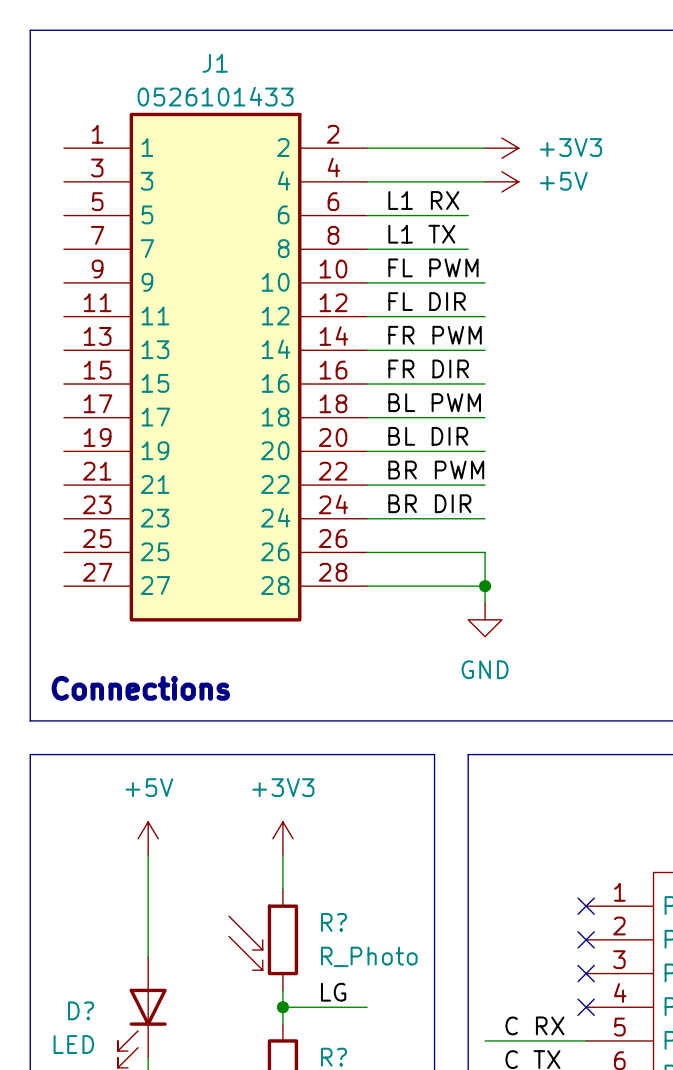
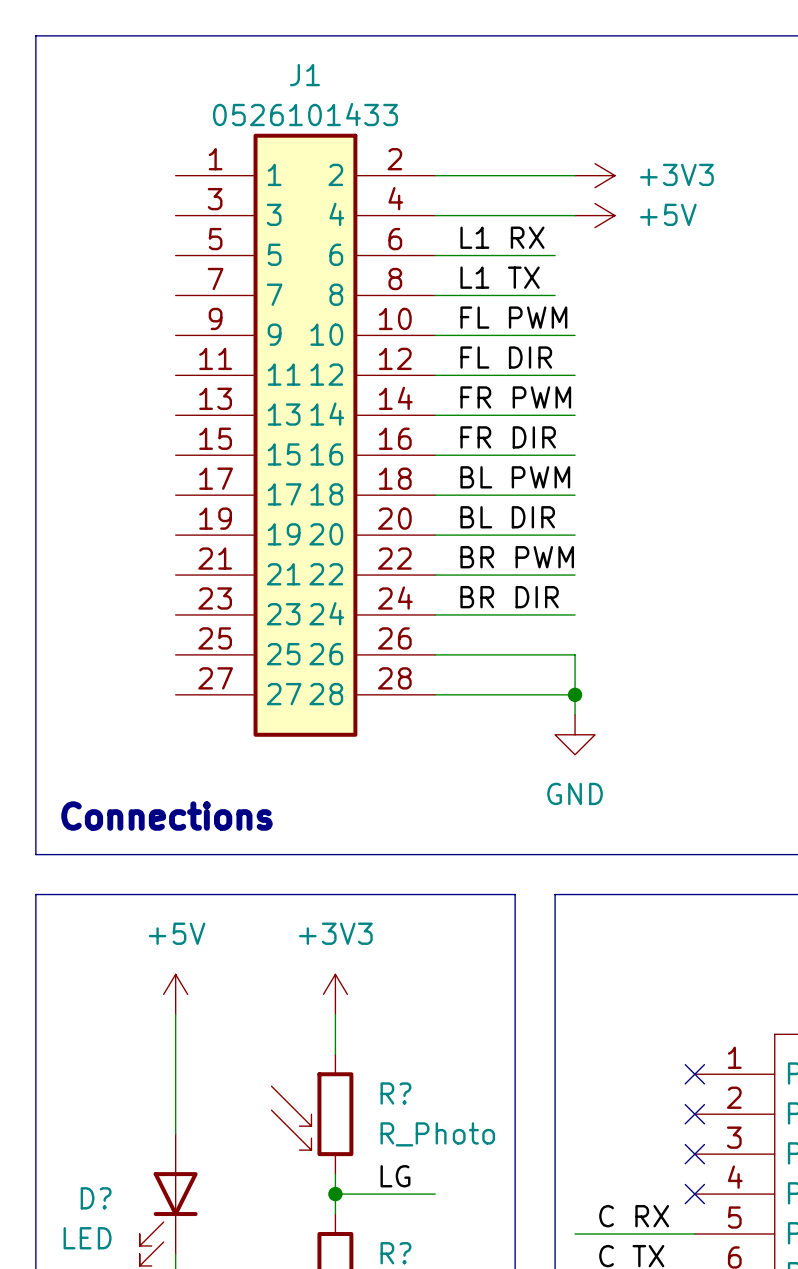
J1 symbol: [63, 112, 368, 622] -> [175, 133, 436, 737]

